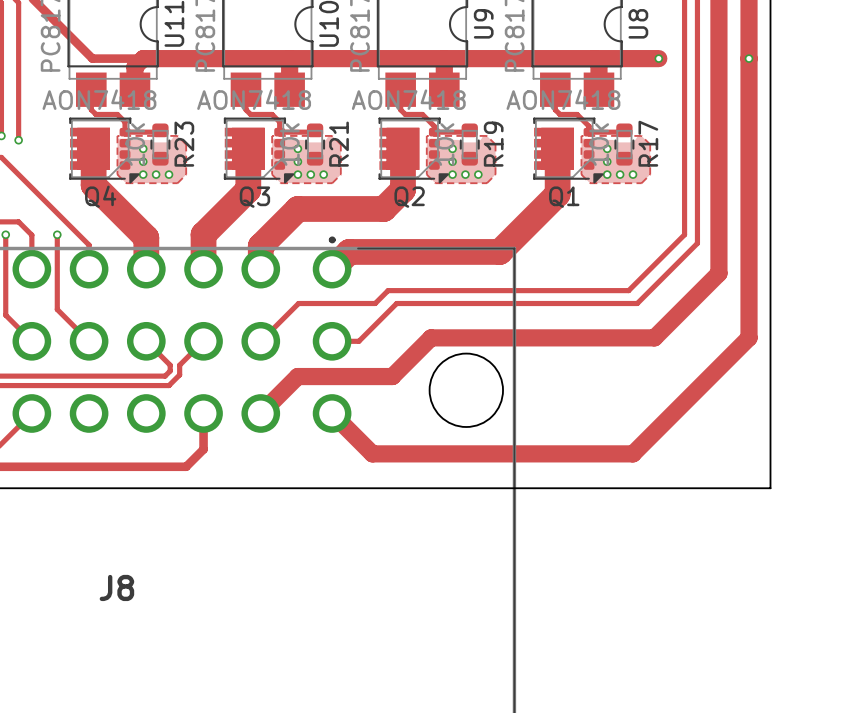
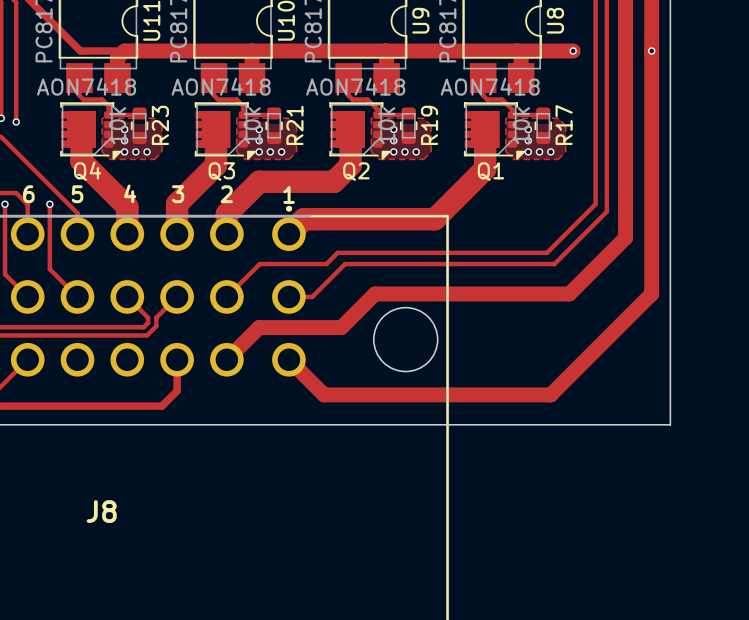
text: none -> 4 (130, 193)
text: none -> 6 (28, 194)
text: none -> 5 (77, 194)
text: none -> 3 (178, 194)
text: none -> 2 (226, 194)
text: none -> 1 (289, 194)

